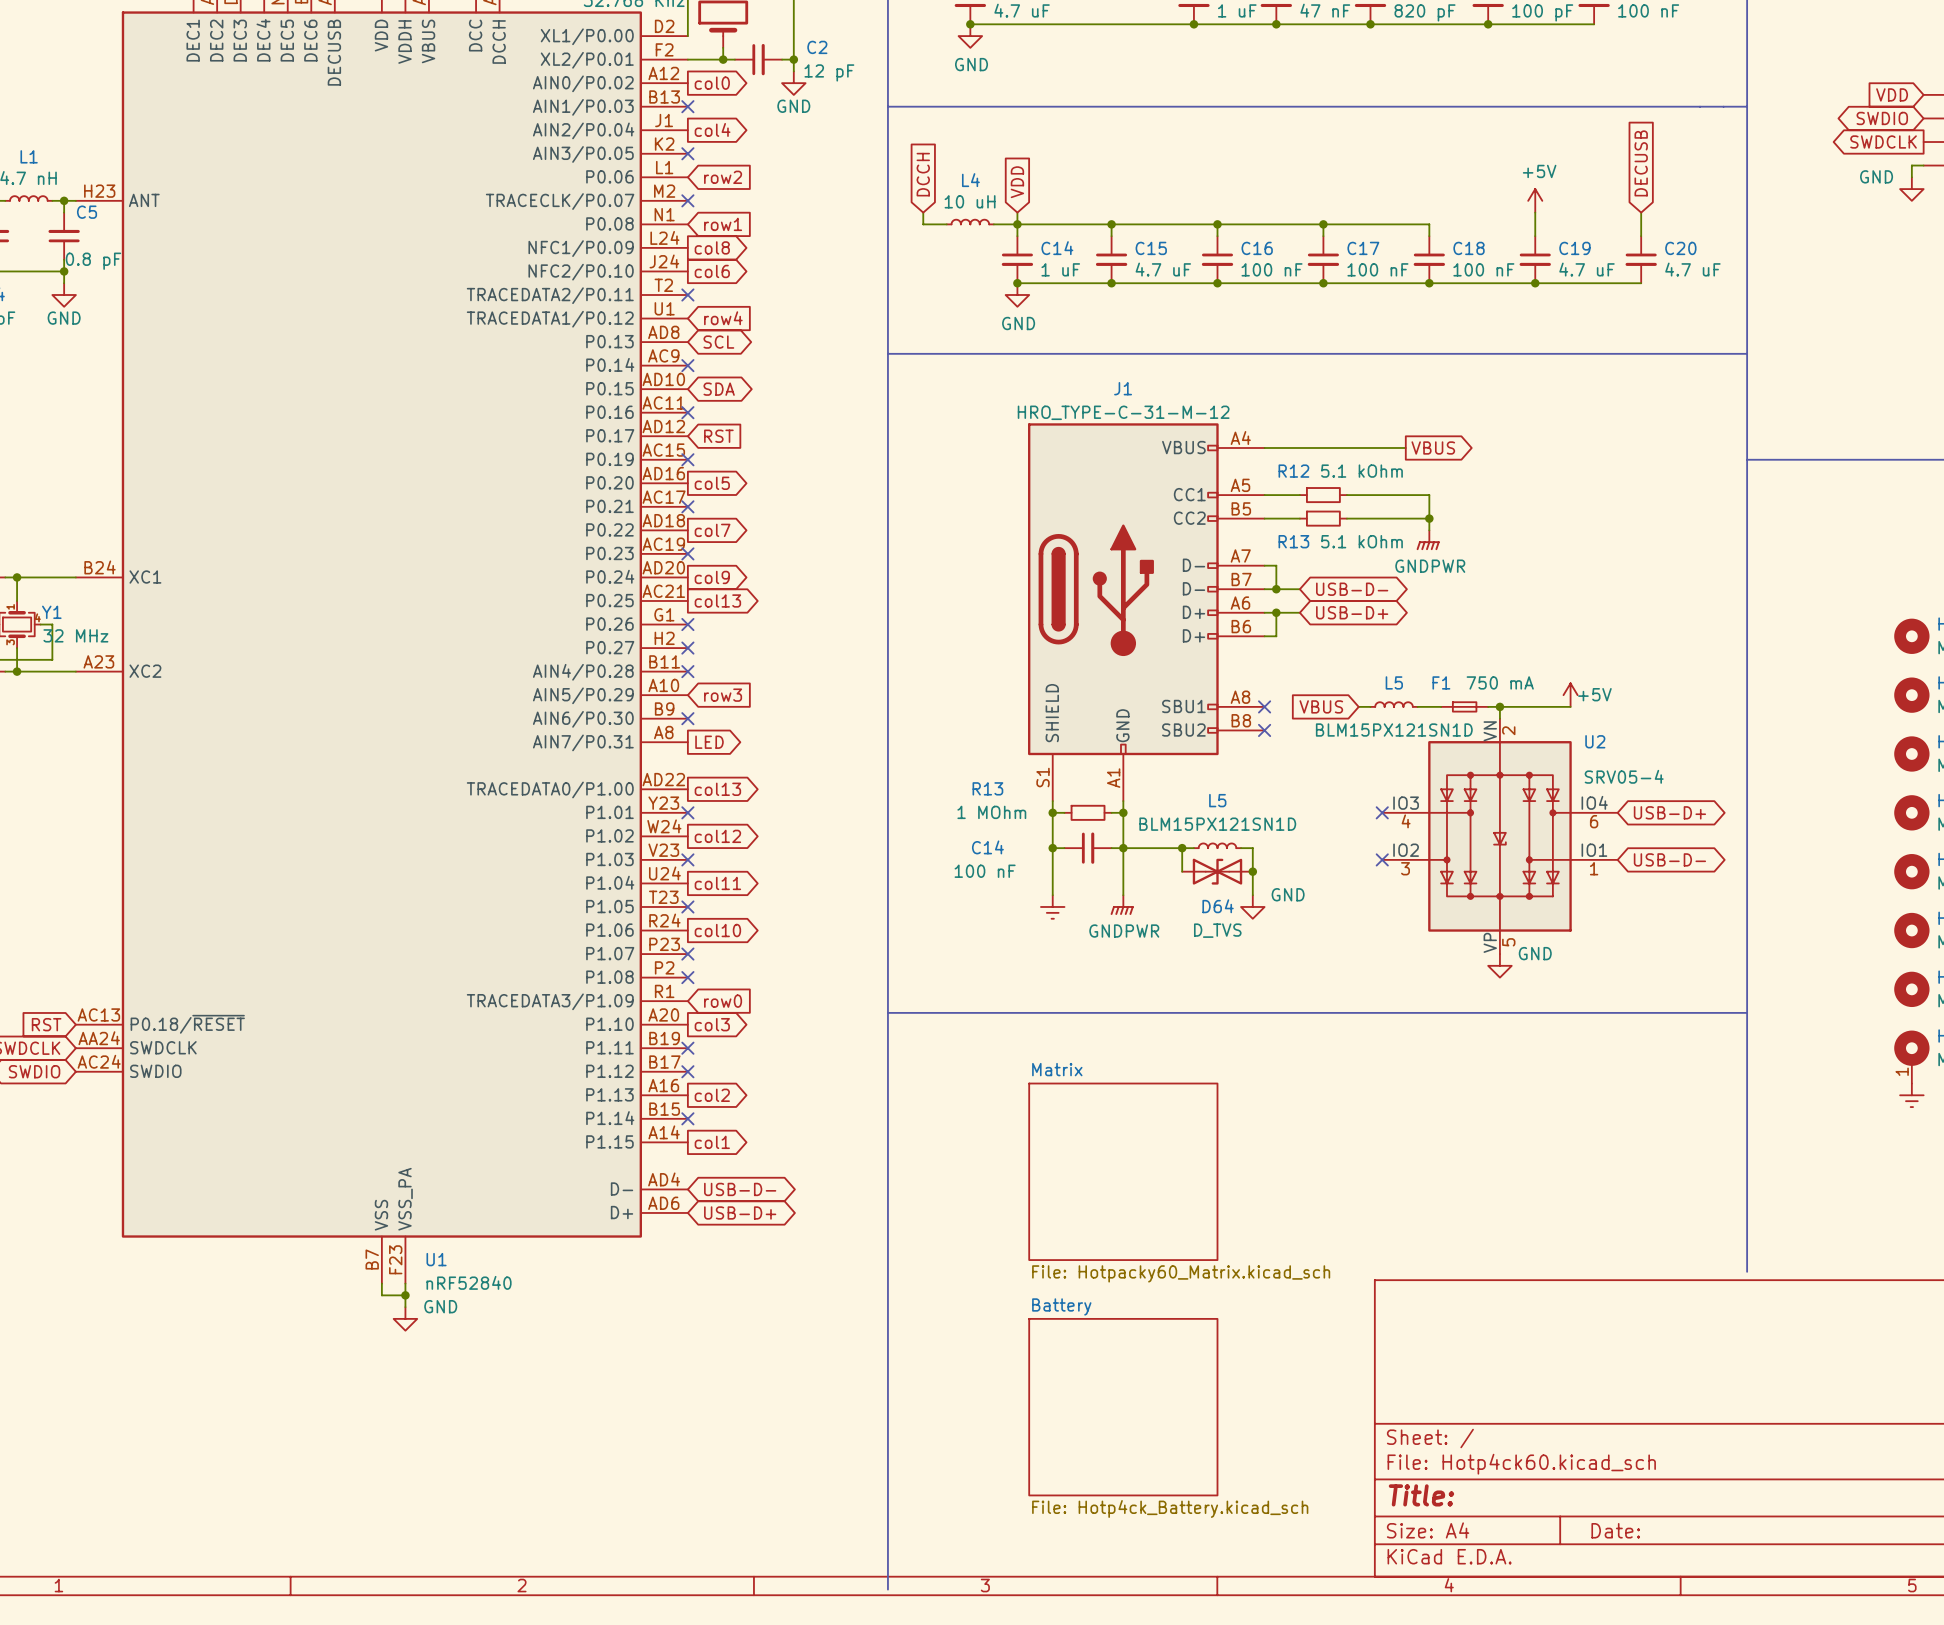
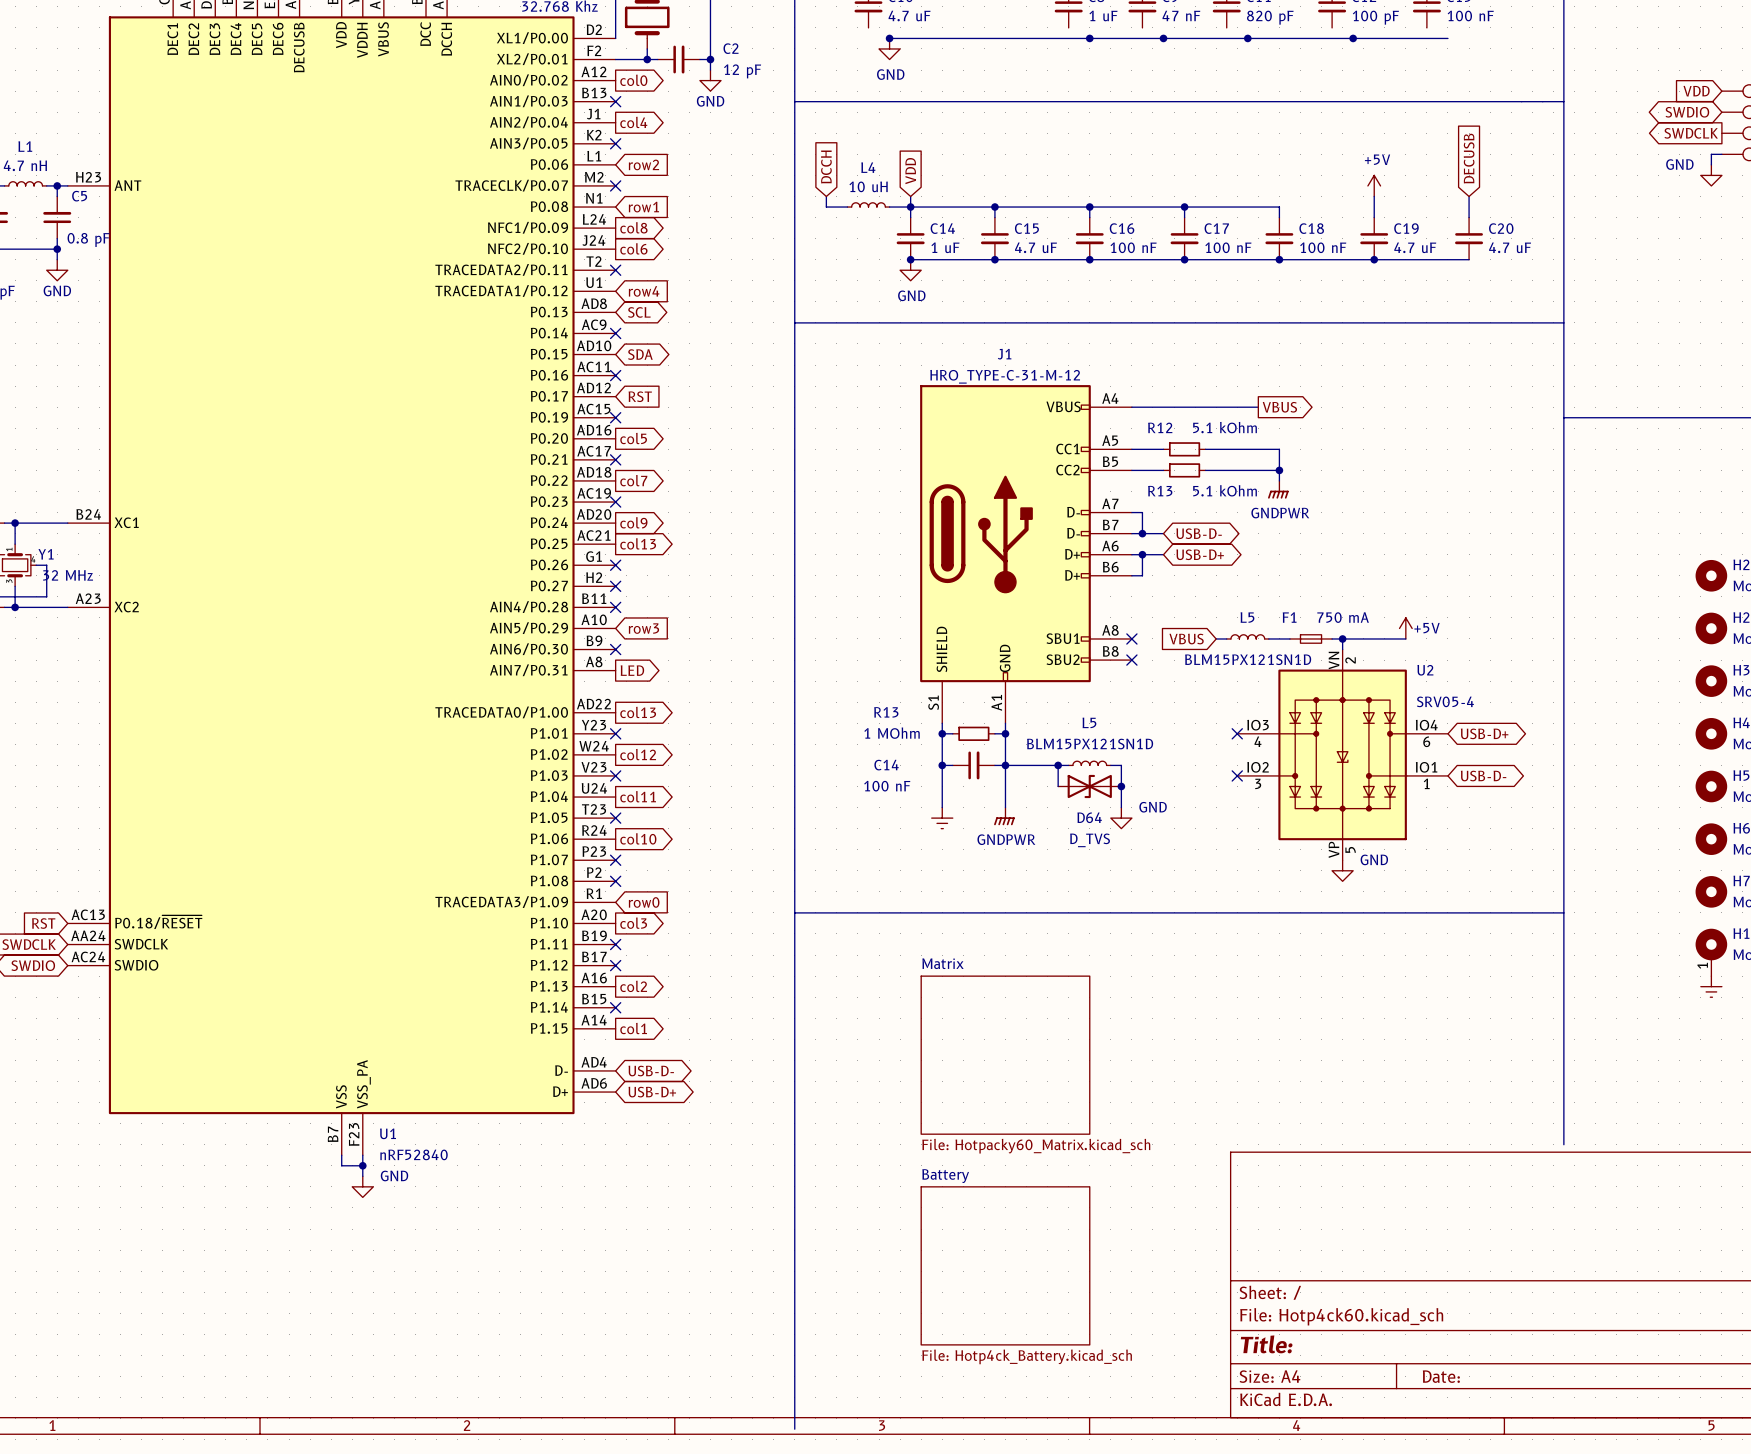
wire: (970, 24) (1594, 24) -> (889, 38) (1447, 38)
junction: (970, 24) -> none
junction: (1193, 24) -> none
junction position: (1276, 24) -> (1163, 38)
junction position: (1370, 24) -> (1247, 38)
junction position: (1488, 24) -> (1353, 38)
power symbol position: GND (970, 36) -> GND (889, 48)
junction: none -> (889, 38)
junction: none -> (1089, 38)

